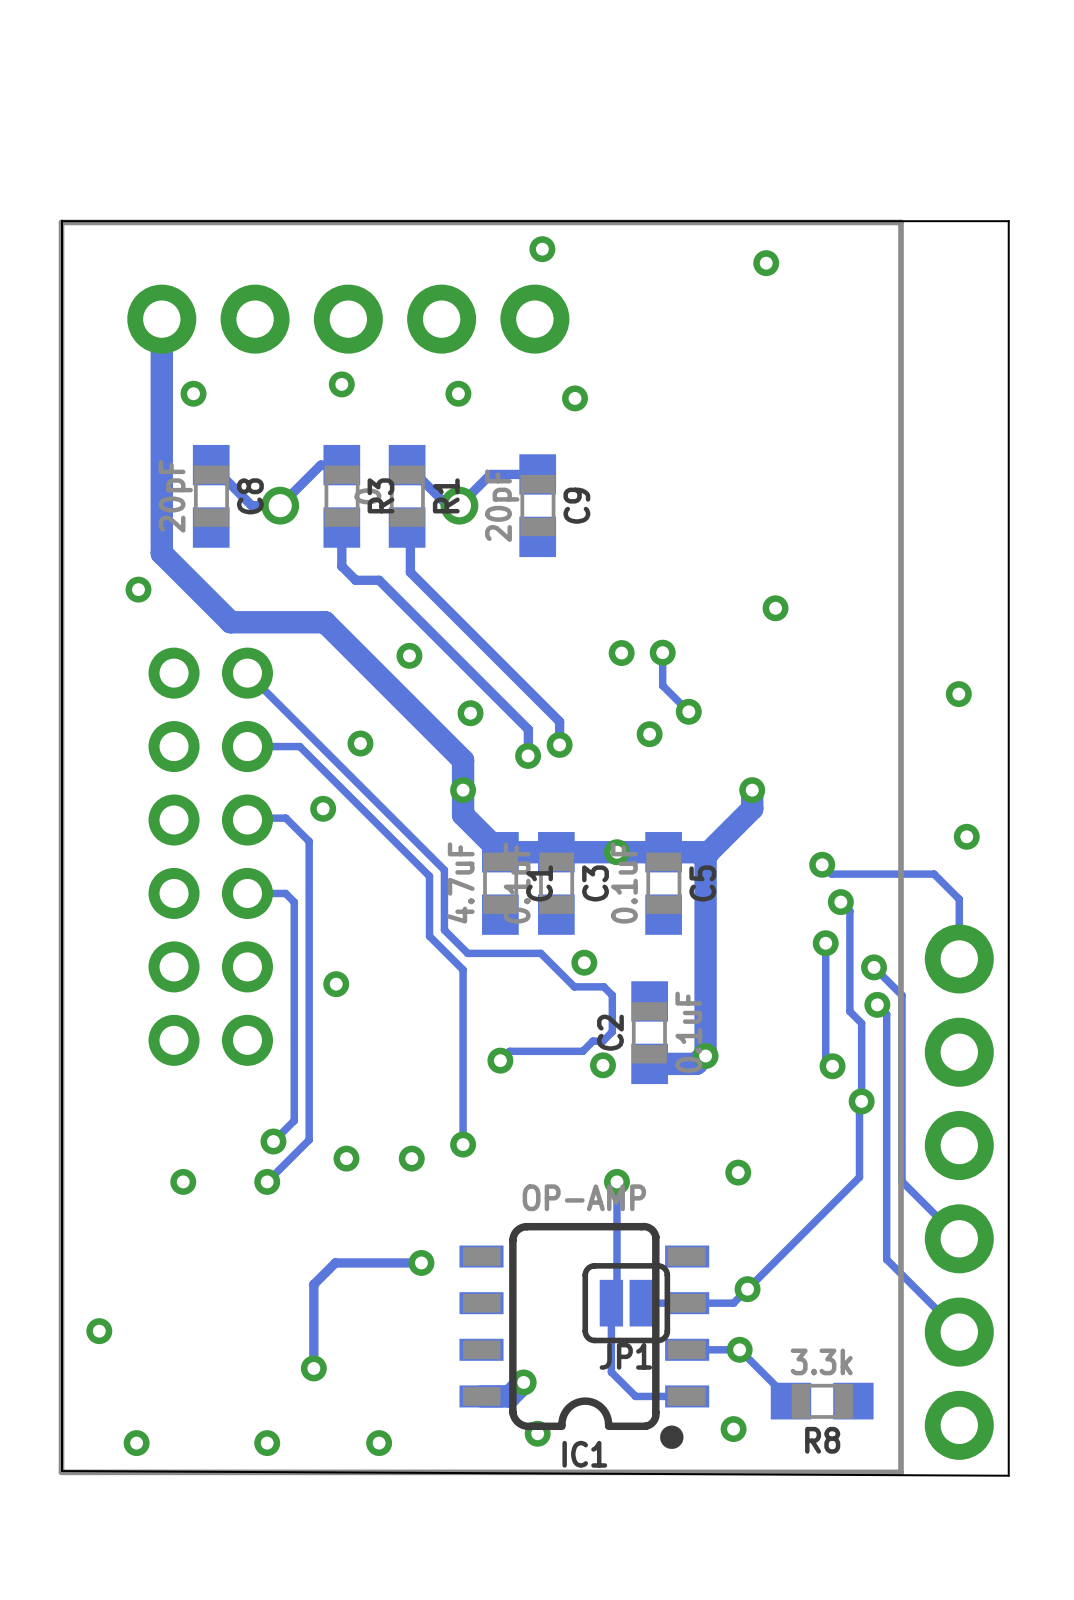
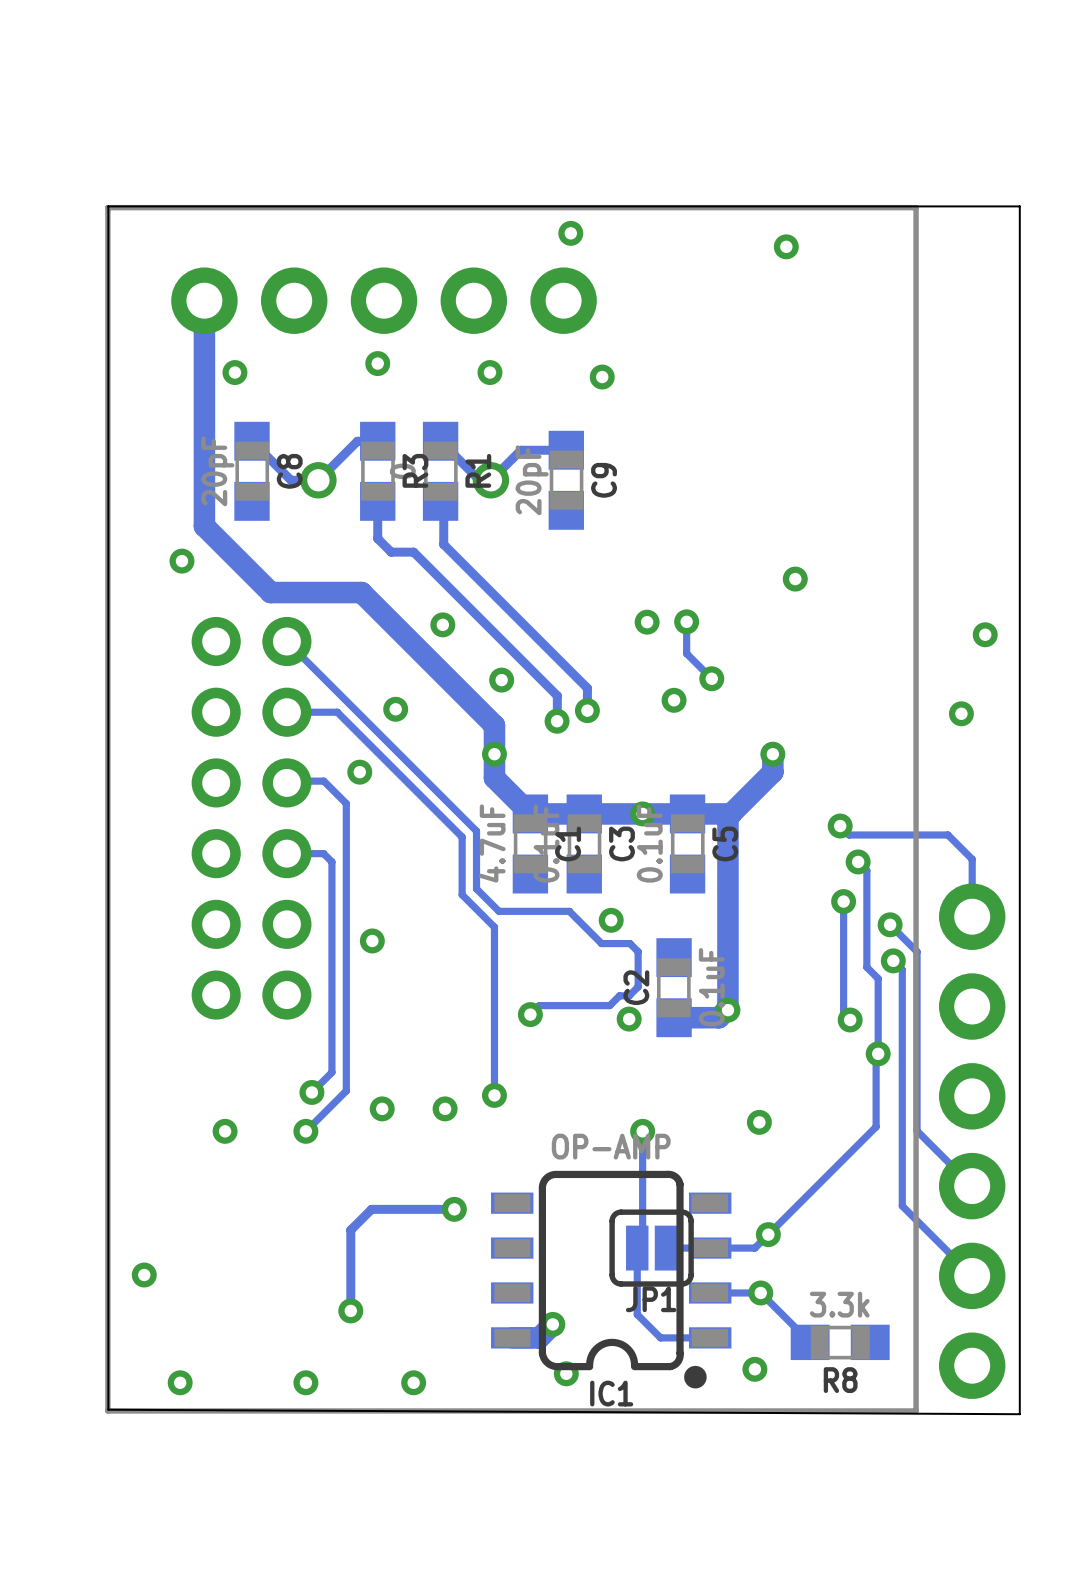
via: none -> (985, 634)
via: (958, 694) -> none
via: none -> (961, 713)
via: (966, 836) -> none

